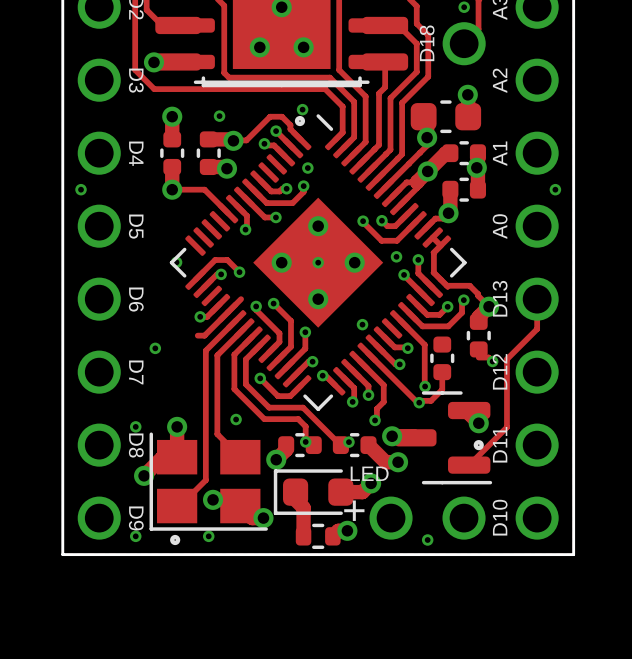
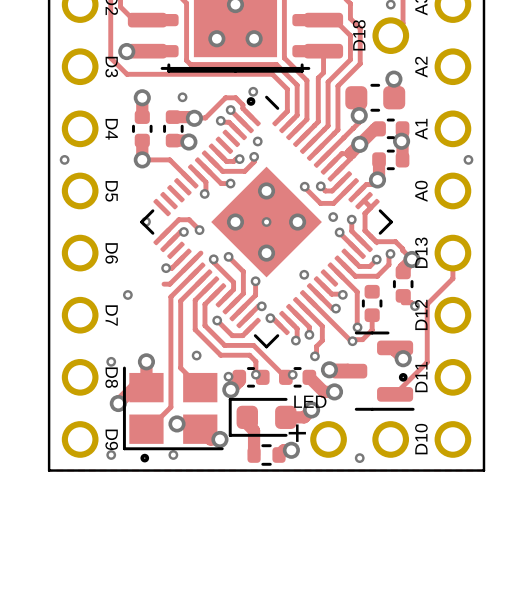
via: none -> (228, 376)

